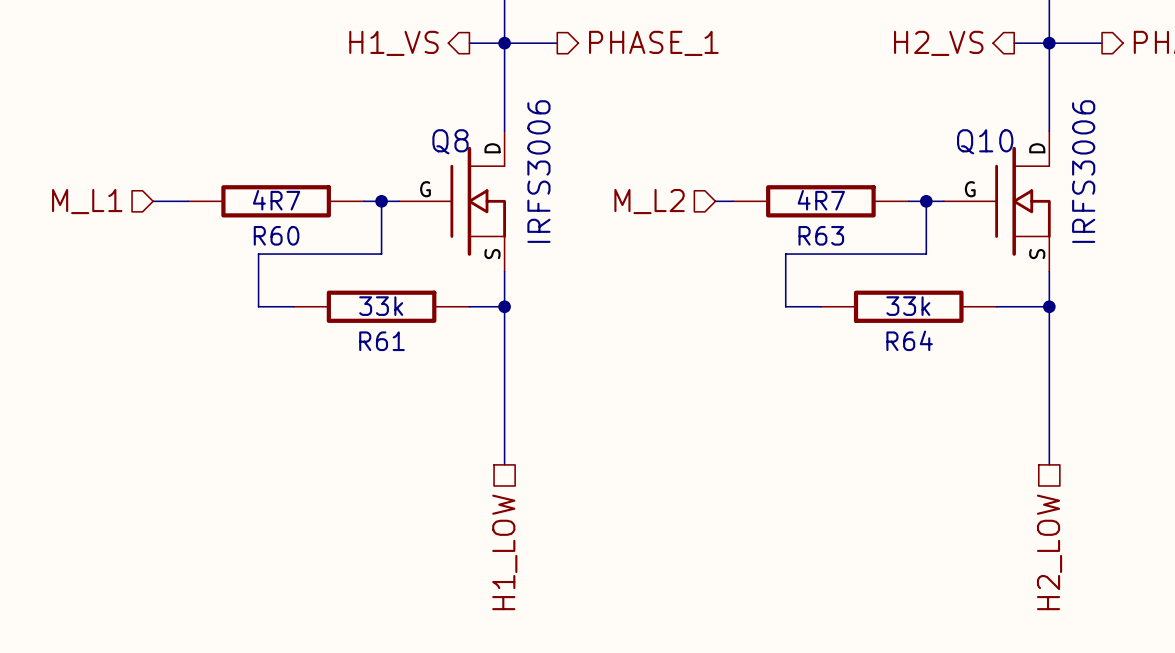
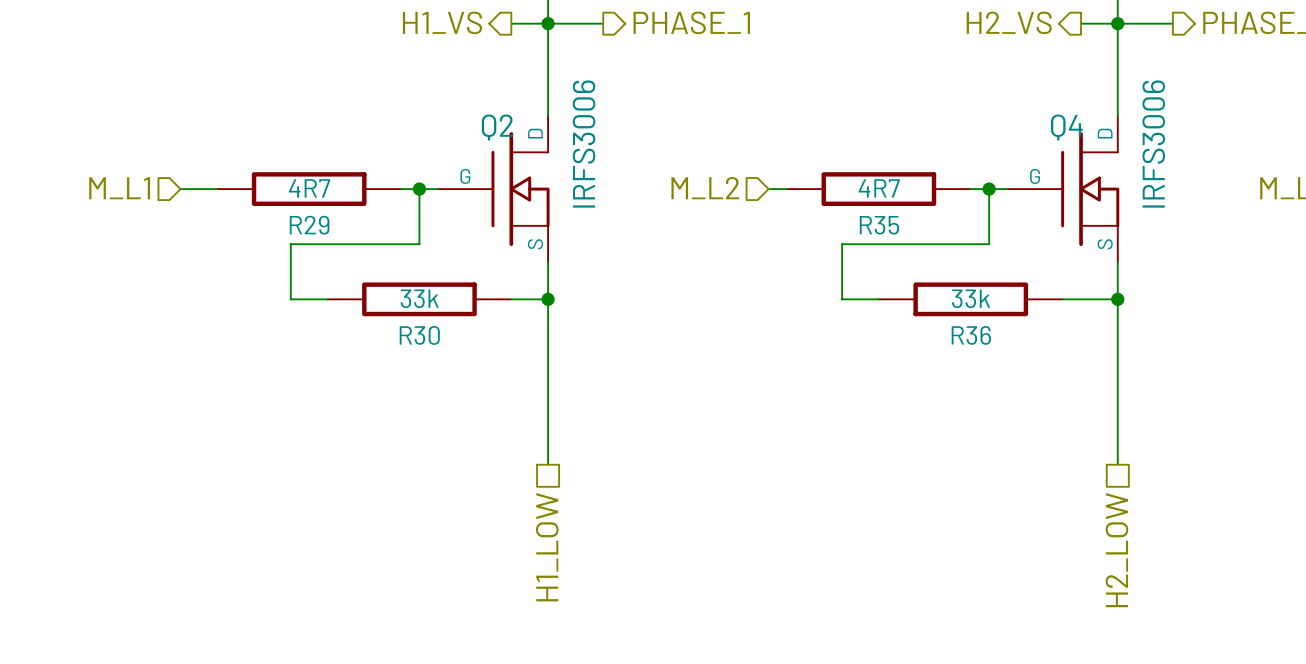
Q8 name: Q8 (450, 141) -> Q2 (497, 127)
Q10 name: Q10 (985, 141) -> Q4 (1066, 127)
R60 name: R60 (276, 235) -> R29 (309, 225)
R63 name: R63 (821, 235) -> R35 (879, 225)
R64 name: R64 (909, 340) -> R36 (971, 335)
R61 name: R61 (381, 341) -> R30 (419, 335)

